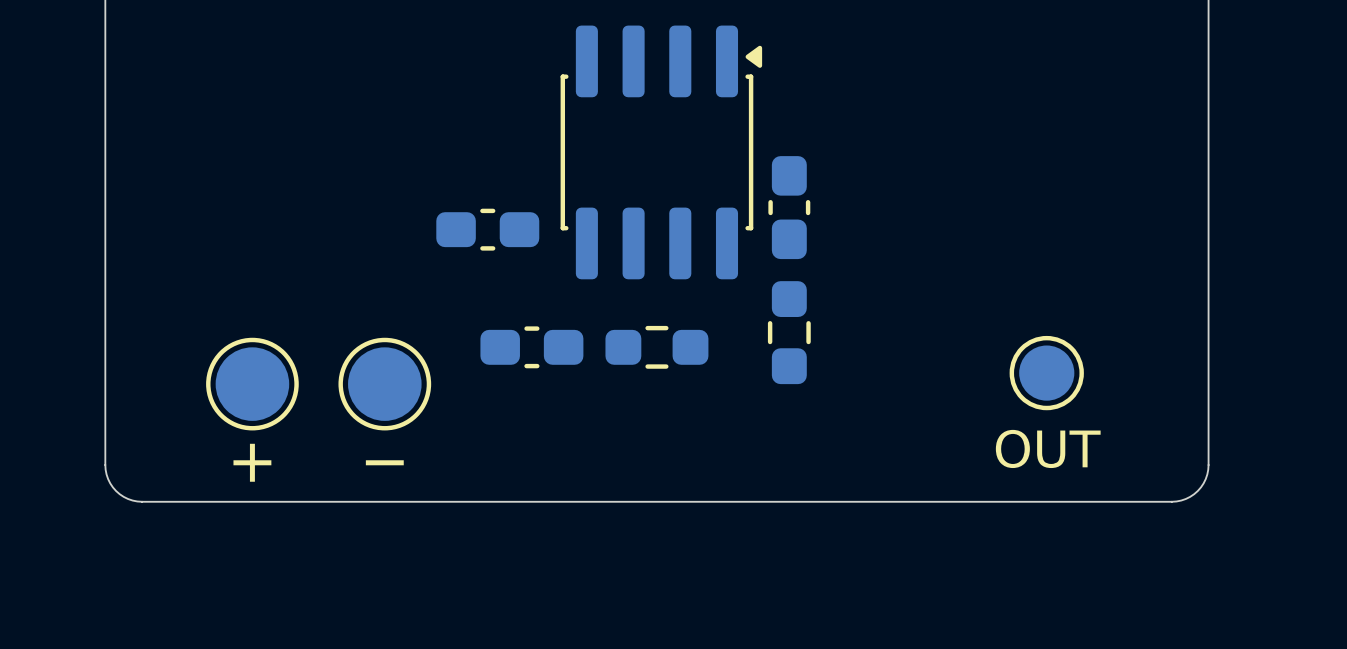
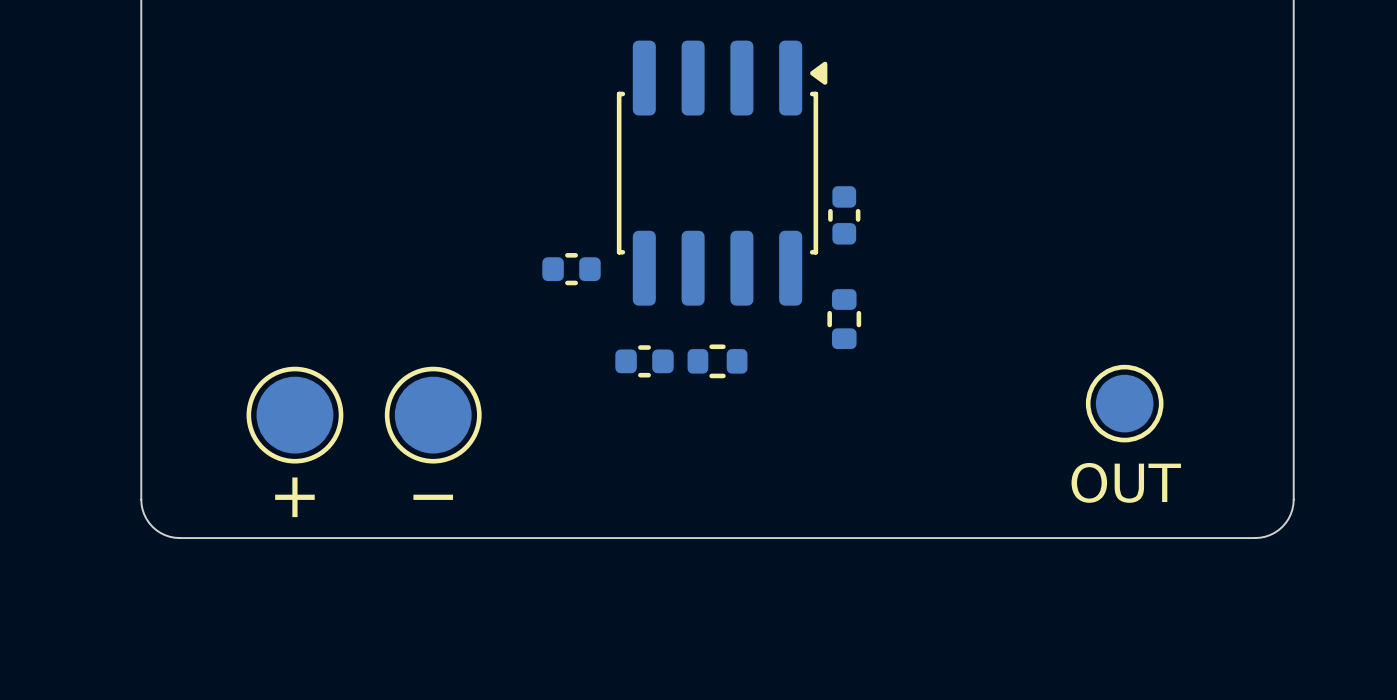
part footprint: [768, 156, 811, 260] -> [828, 186, 861, 245]
part footprint: [436, 208, 540, 251] -> [542, 253, 601, 286]
part: none -> (844, 319)
part footprint: [605, 325, 709, 369] -> [687, 344, 748, 379]
part: none -> (644, 361)
part: (789, 332) -> none
part: (531, 347) -> none

